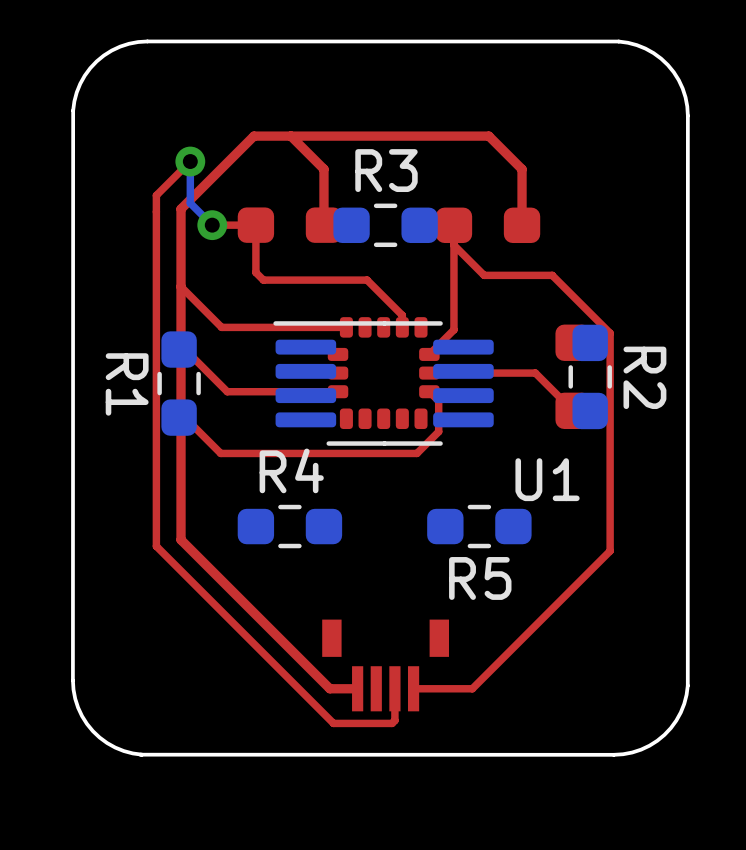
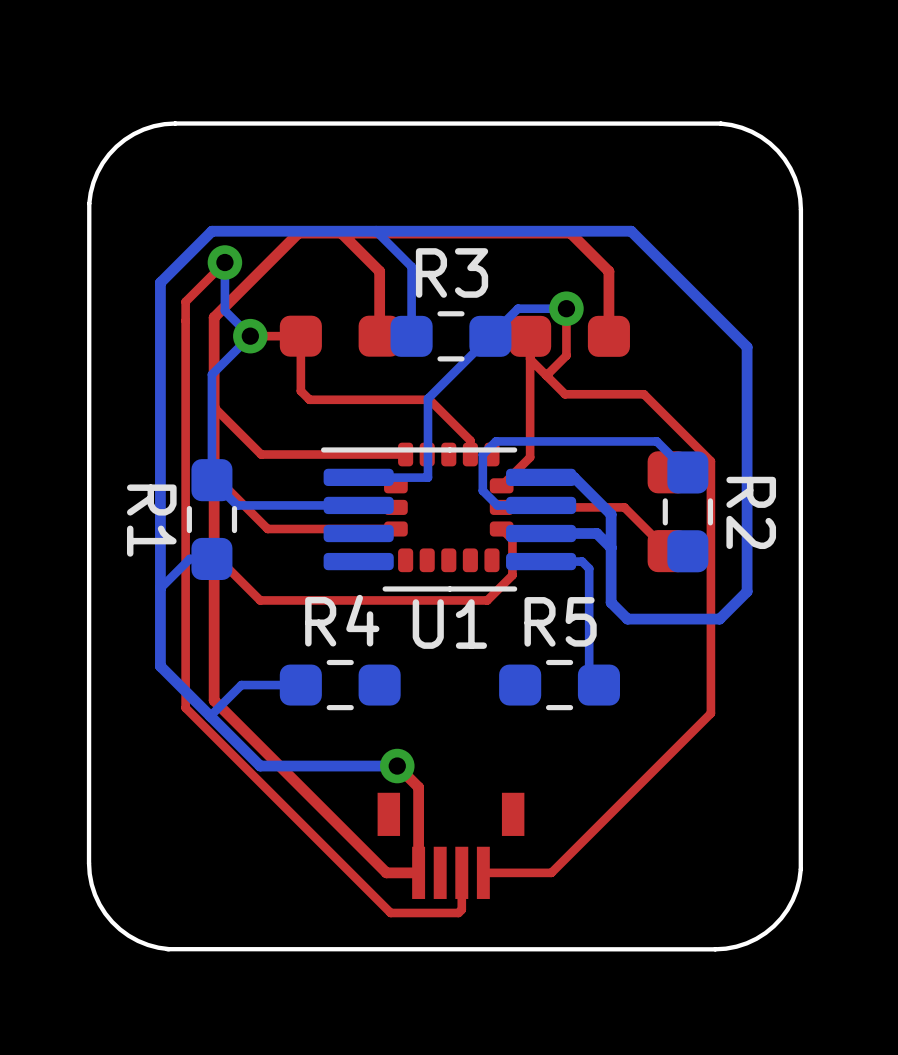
bottom track: none -> (376, 231) (411, 266) (411, 336)
top track: none -> (566, 308) (566, 355) (546, 375)
bottom track: none -> (566, 308) (518, 308) (427, 398) (427, 477) (358, 477)
via: none -> (566, 308)
bottom track: none -> (250, 336) (211, 374) (211, 480) (237, 505) (358, 505)
bottom track: none -> (687, 472) (656, 441) (495, 441) (482, 454) (482, 490) (497, 505) (541, 505)
bottom track: none -> (541, 477) (574, 477) (611, 514) (611, 602) (627, 619) (719, 619) (747, 591) (747, 347) (631, 231) (211, 231) (160, 282) (160, 666) (260, 766) (397, 766)
bottom track: none -> (541, 533) (596, 533) (611, 547)
bottom track: none -> (211, 558) (189, 558) (160, 588)
bottom track: none -> (541, 561) (582, 561) (589, 568) (589, 675) (598, 685)
U1 name position: U1 (547, 479) -> U1 (449, 624)
bottom track: none -> (300, 685) (241, 685) (210, 716)
R5 name position: R5 (480, 578) -> R5 (560, 621)
top track: none -> (397, 766) (418, 787) (418, 872)
via: none -> (397, 766)

